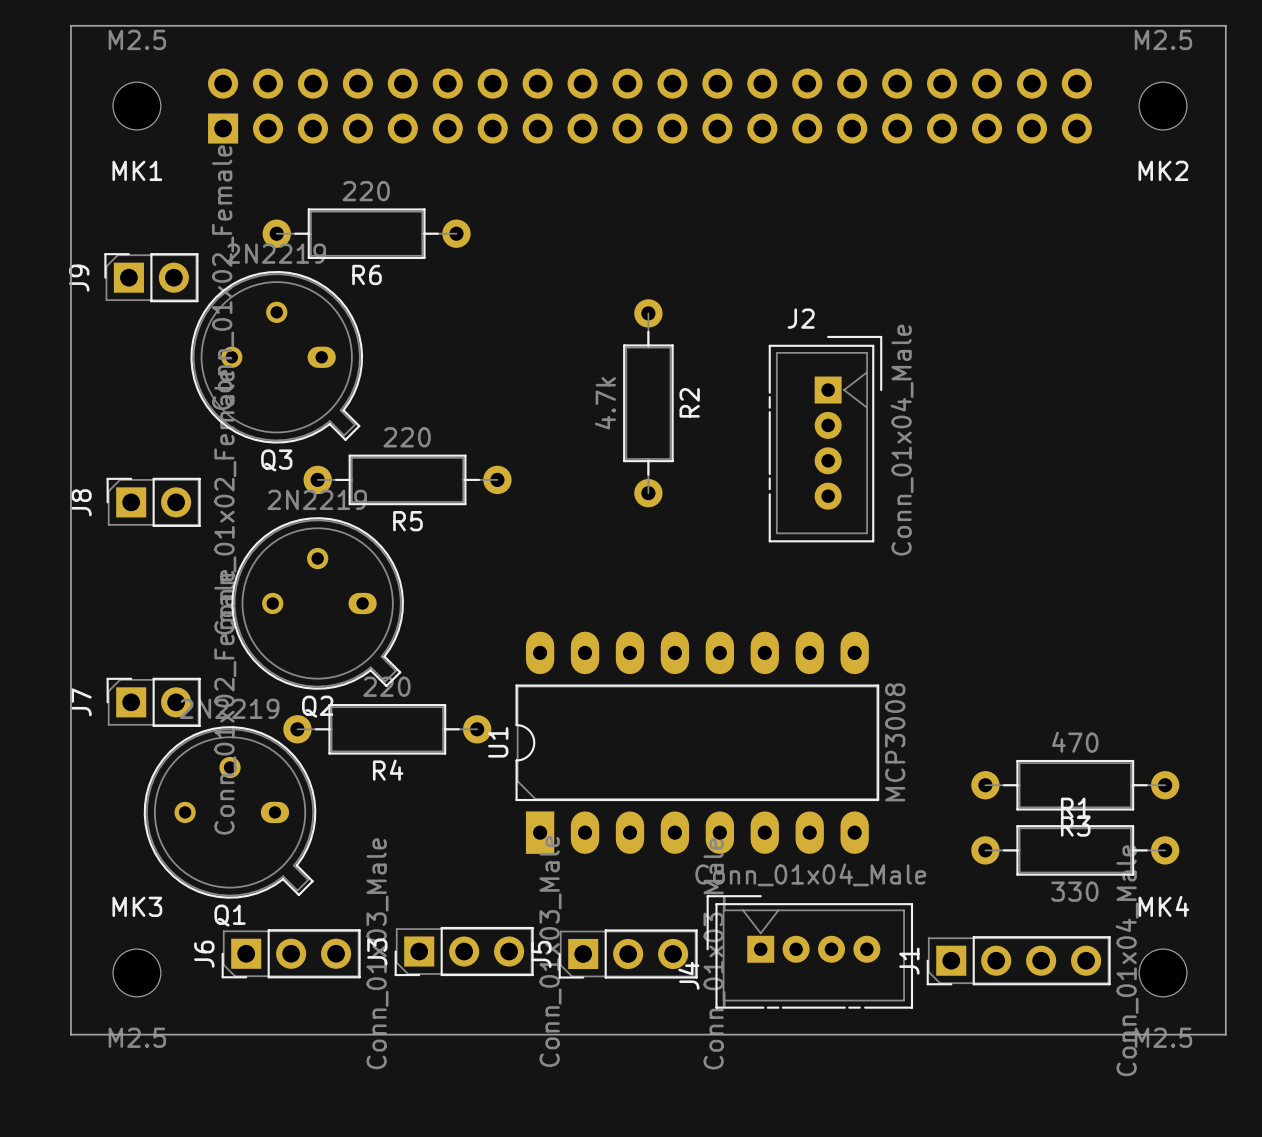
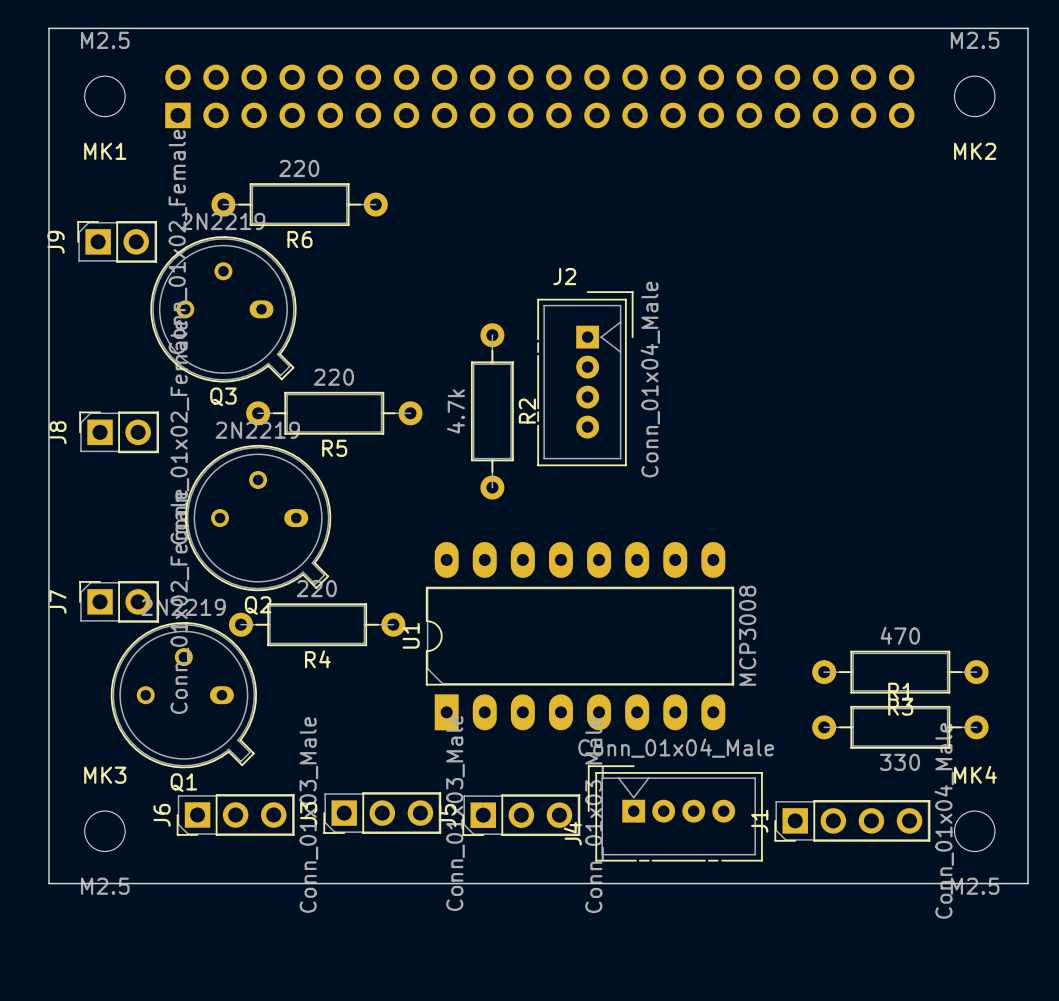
R2 position: (648, 403) -> (492, 411)
J2 position: (825, 439) -> (585, 378)

